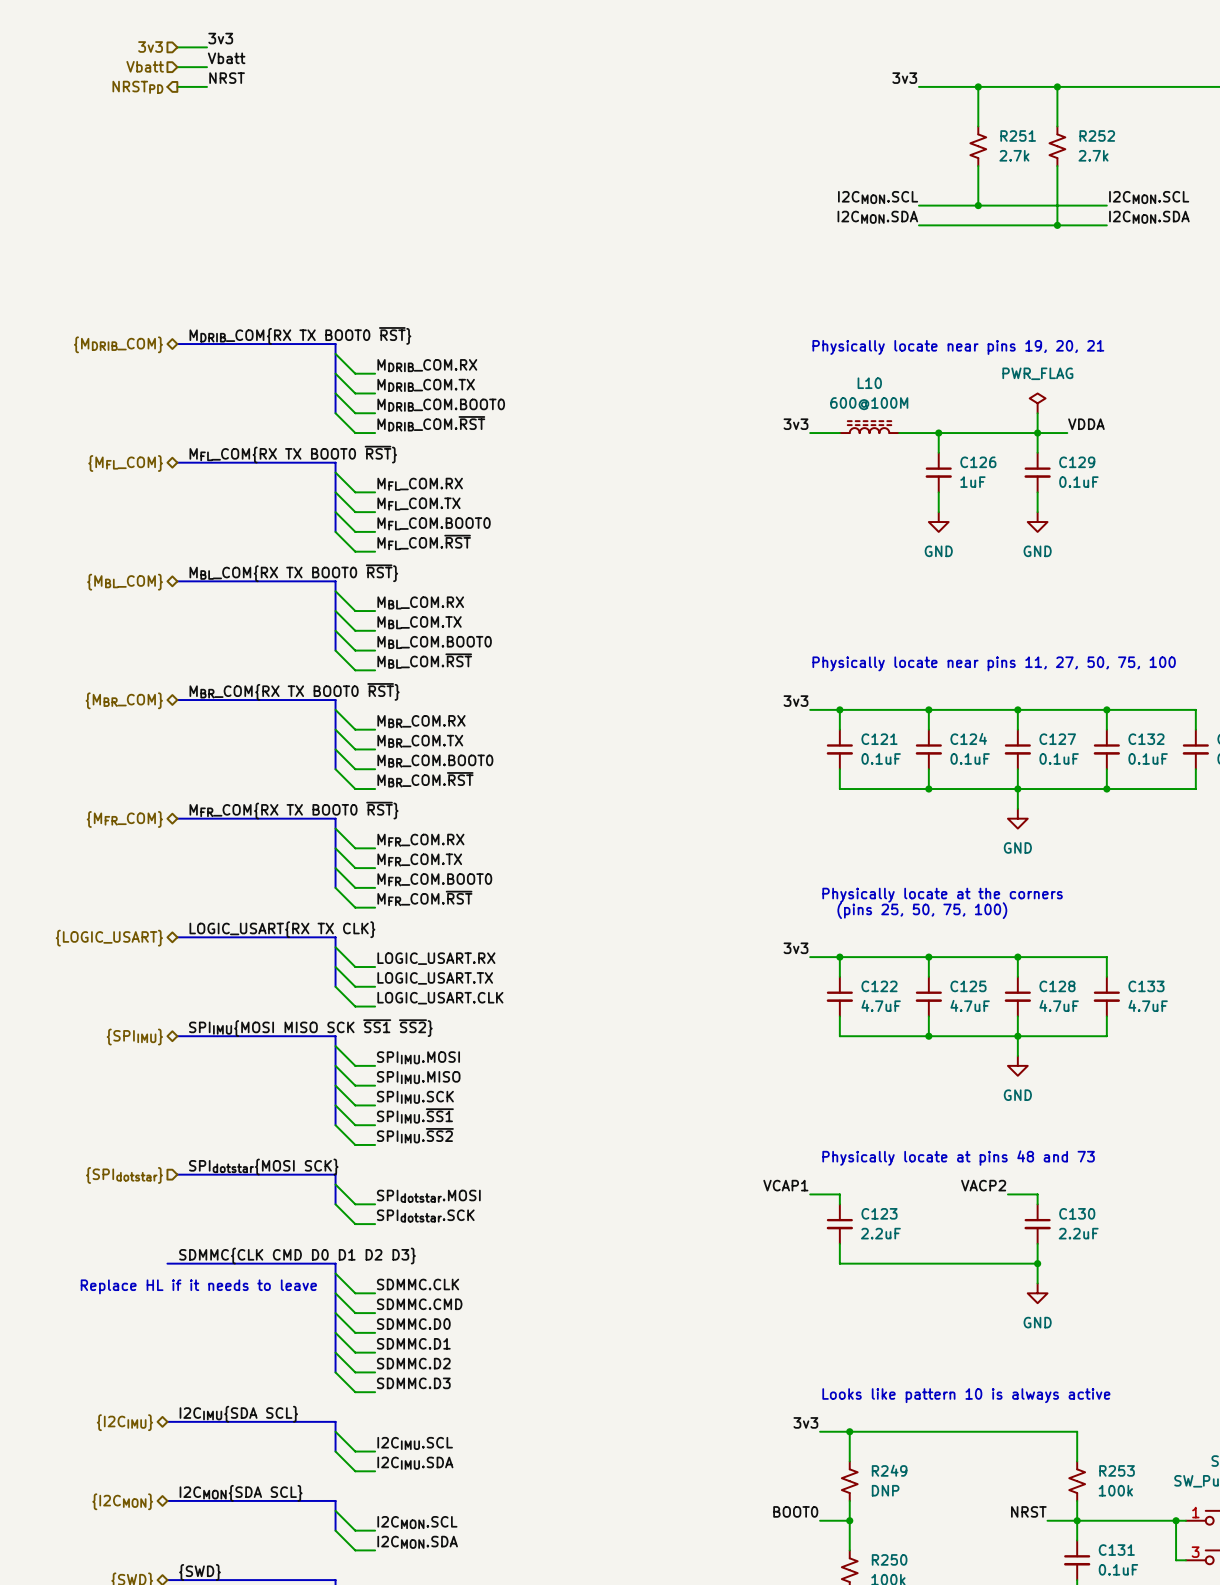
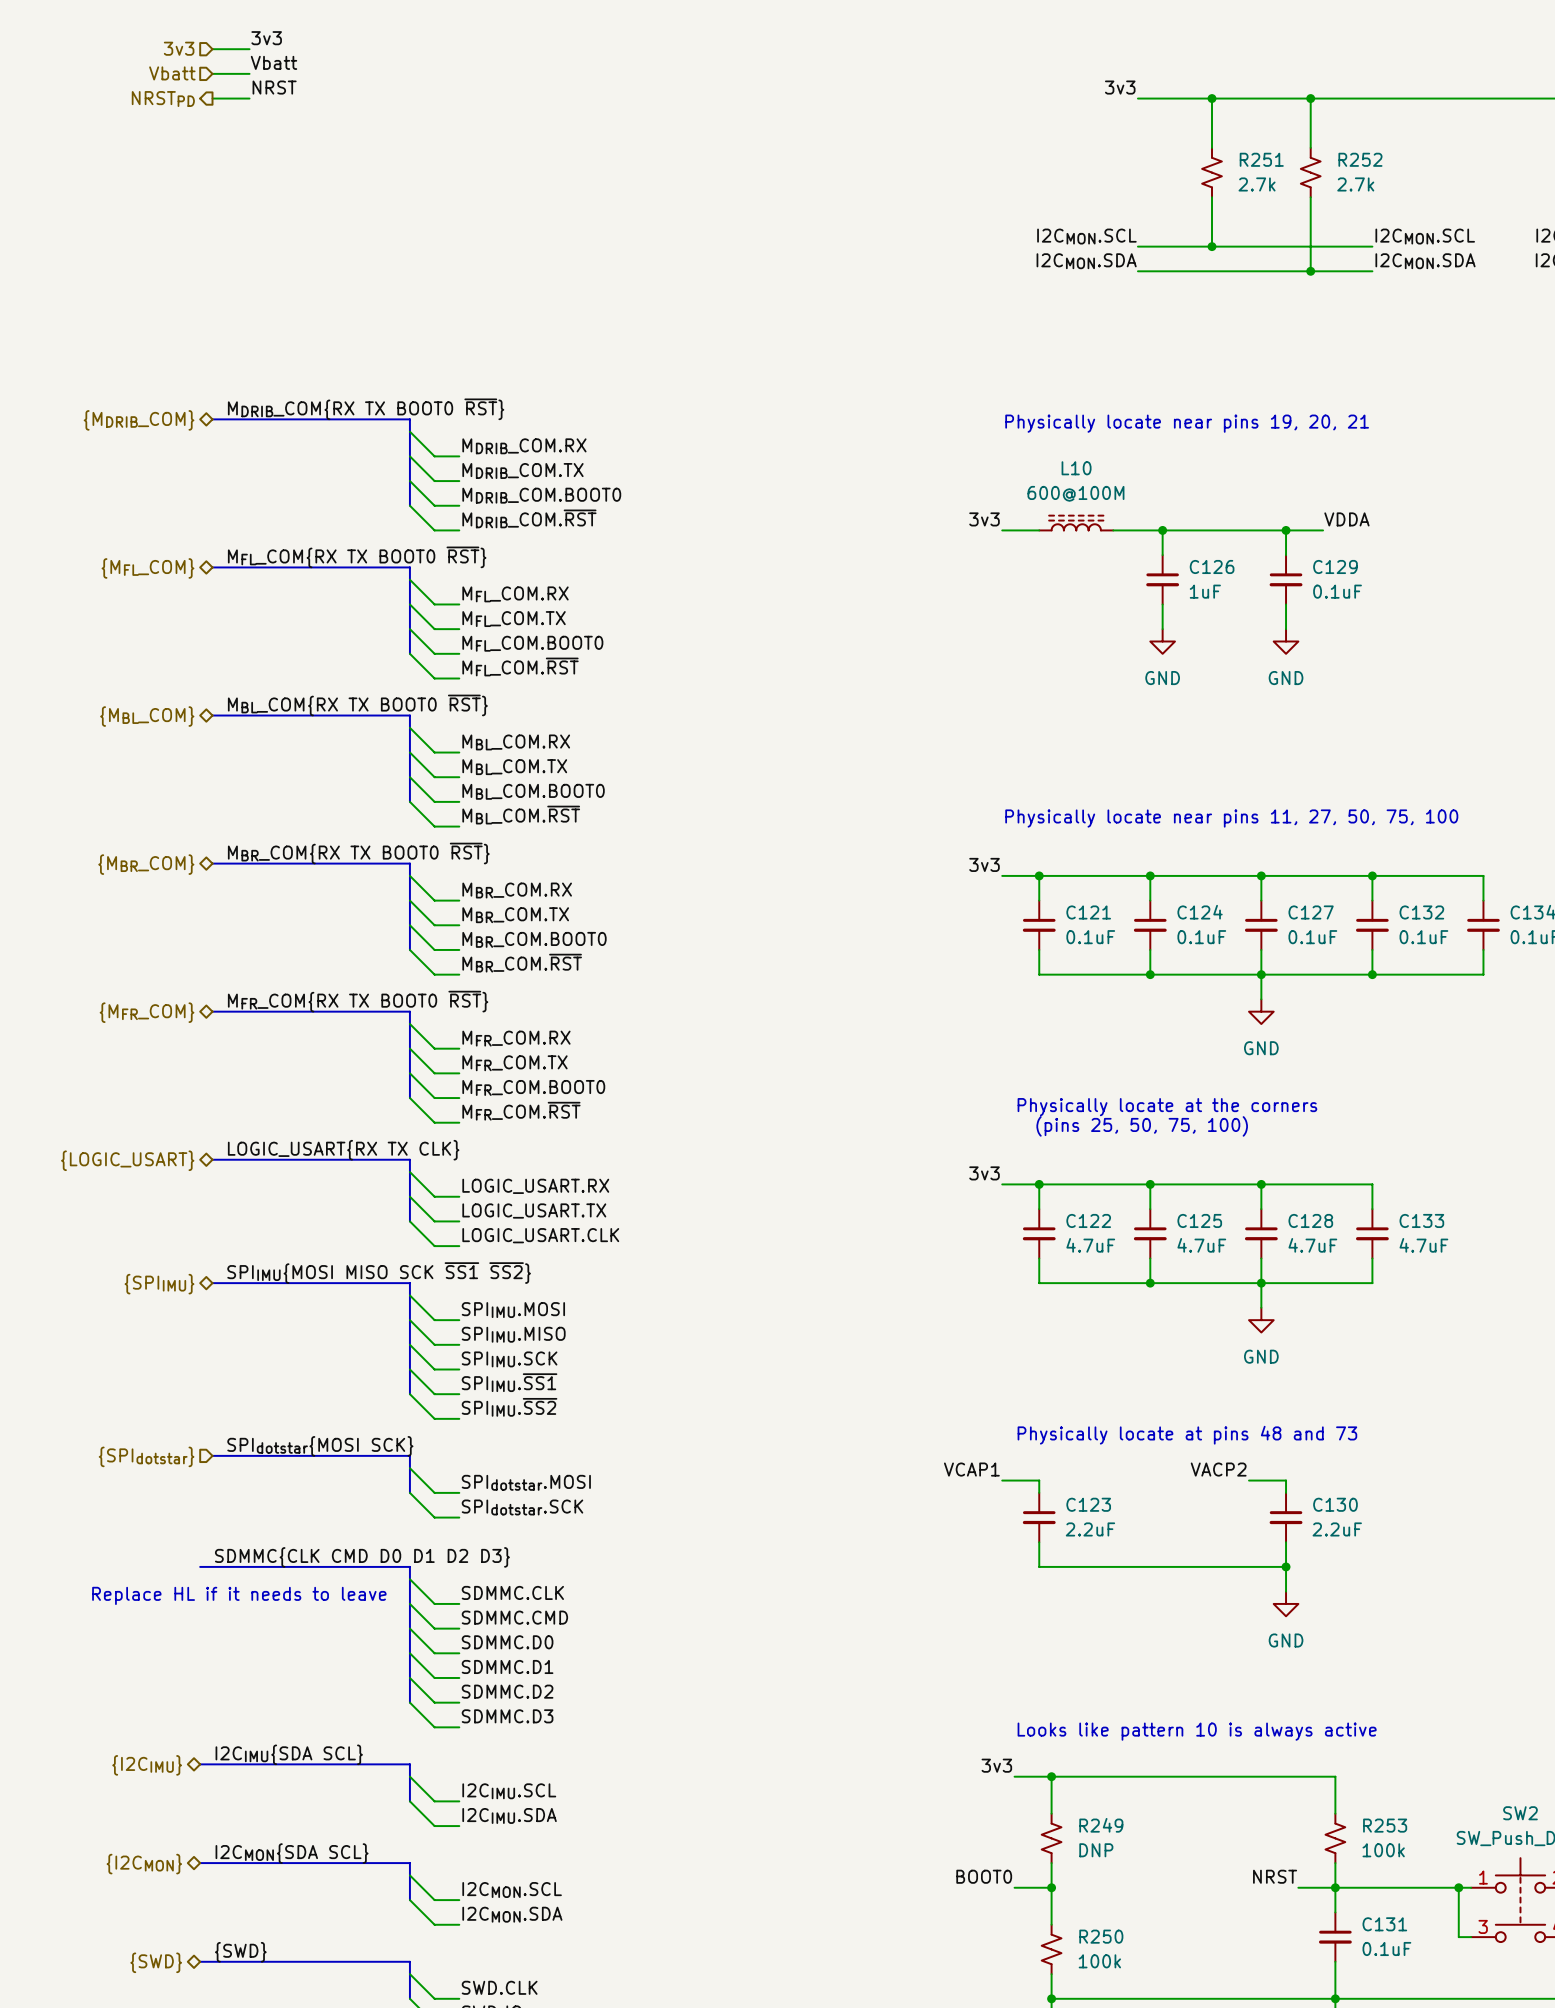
power symbol: PWR_FLAG (1037, 403) -> none
wire: (1037, 413) (1037, 433) -> none

